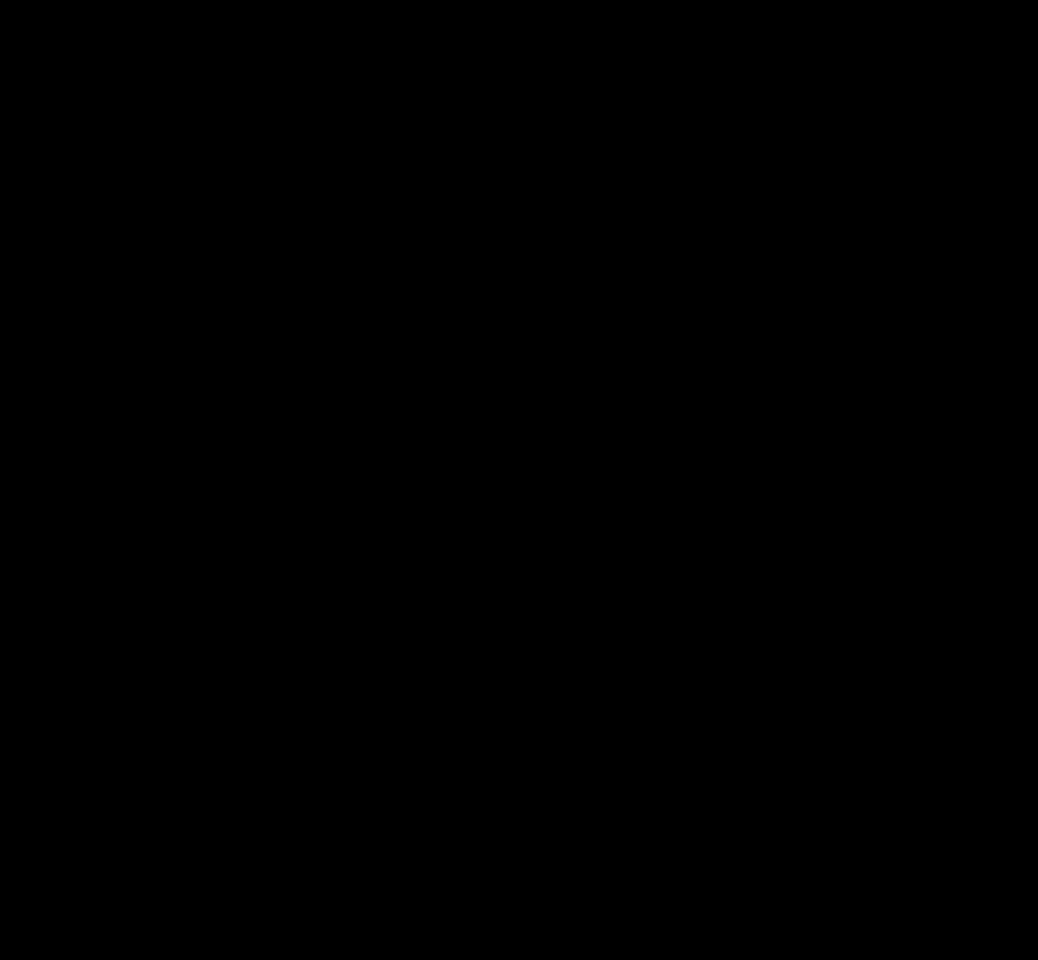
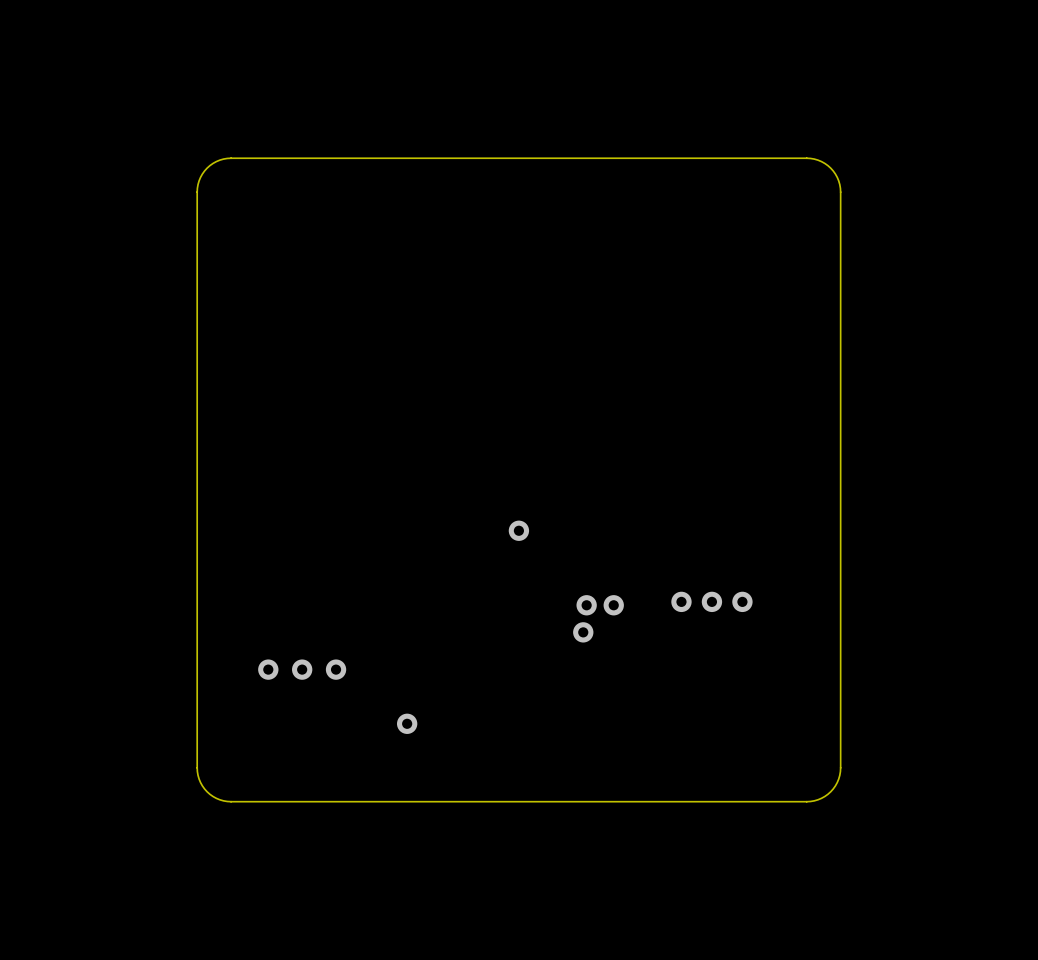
board edge: none -> (806, 158) (231, 158) (219, 160) (207, 168) (199, 180) (197, 192) (197, 767) (200, 782) (207, 791) (216, 798) (231, 801) (806, 801) (817, 799) (830, 791) (838, 779) (840, 767) (840, 192) (838, 180) (830, 168) (817, 160) (806, 158)
via: none -> (518, 530)
via: none -> (681, 601)
via: none -> (711, 601)
via: none -> (742, 601)
via: none -> (586, 605)
via: none -> (613, 605)
via: none -> (583, 632)
via: none -> (268, 669)
via: none -> (302, 669)
via: none -> (336, 669)
via: none -> (407, 723)

